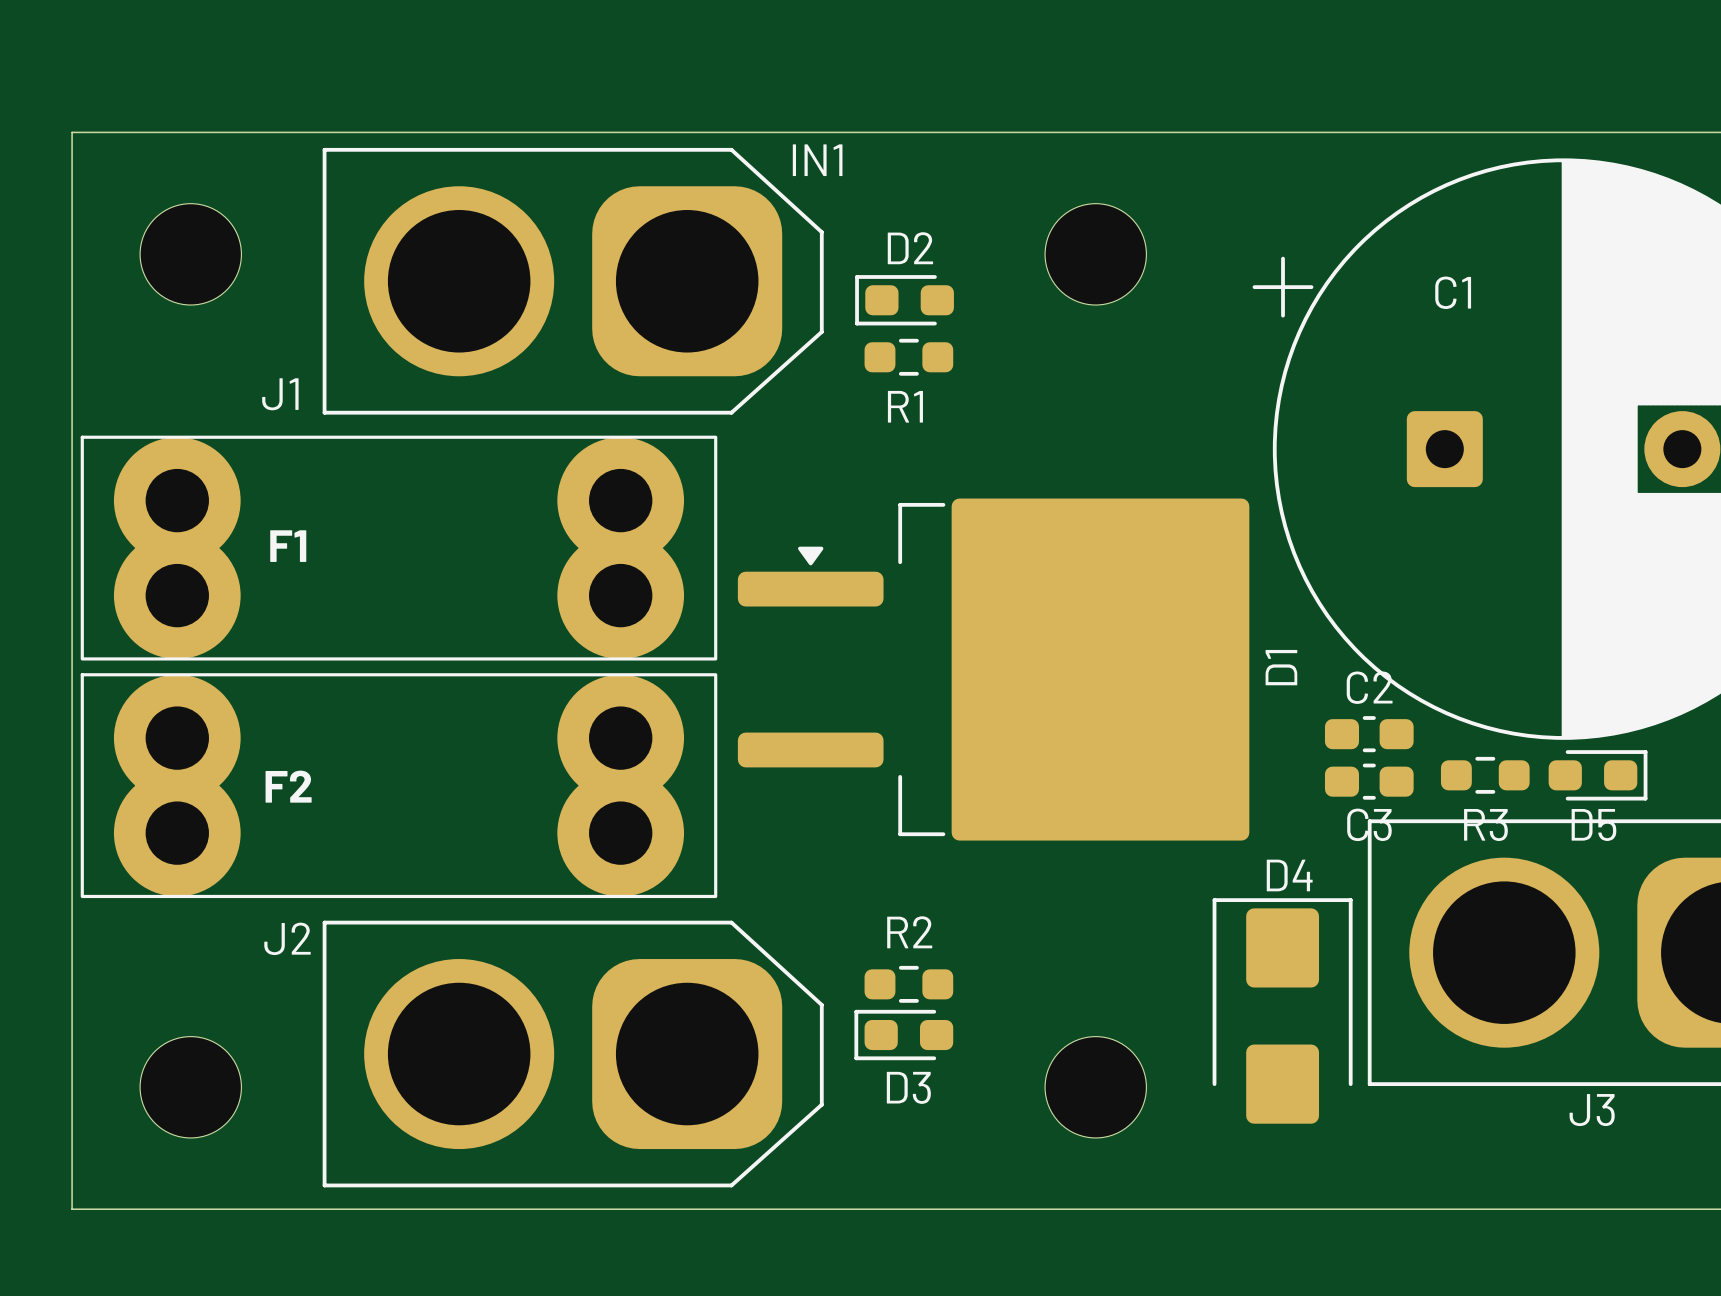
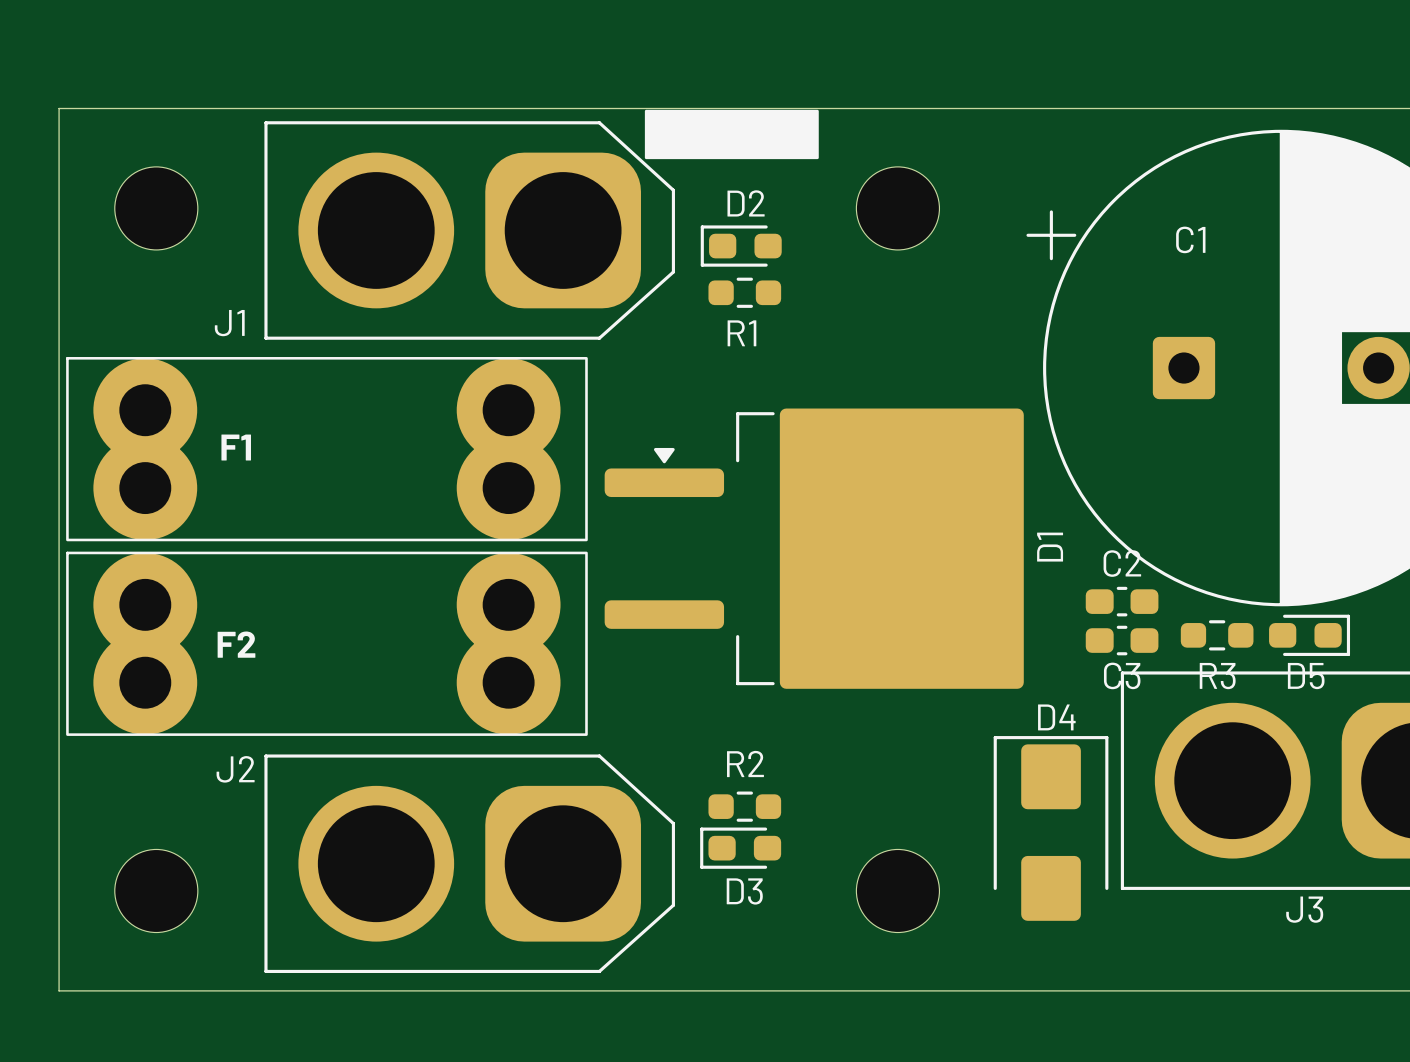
drawing: none -> [644, 109, 819, 160]
text: IN1 (817, 160) -> none

